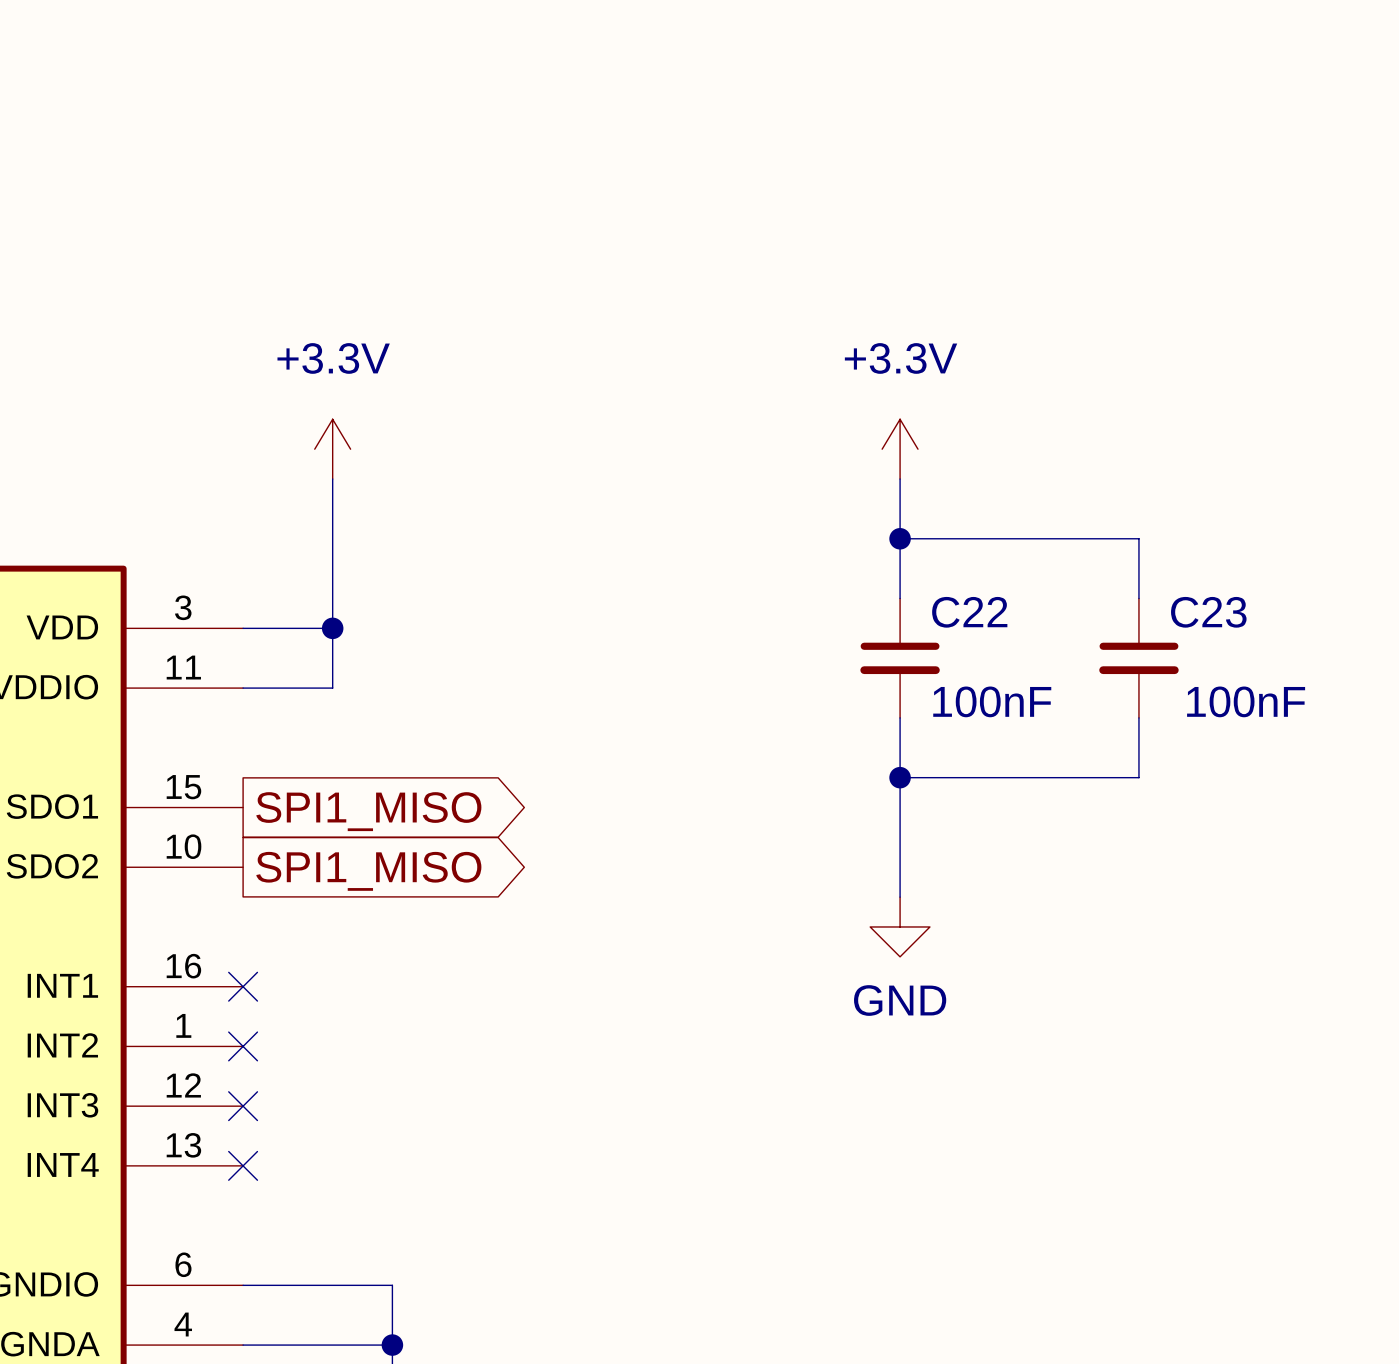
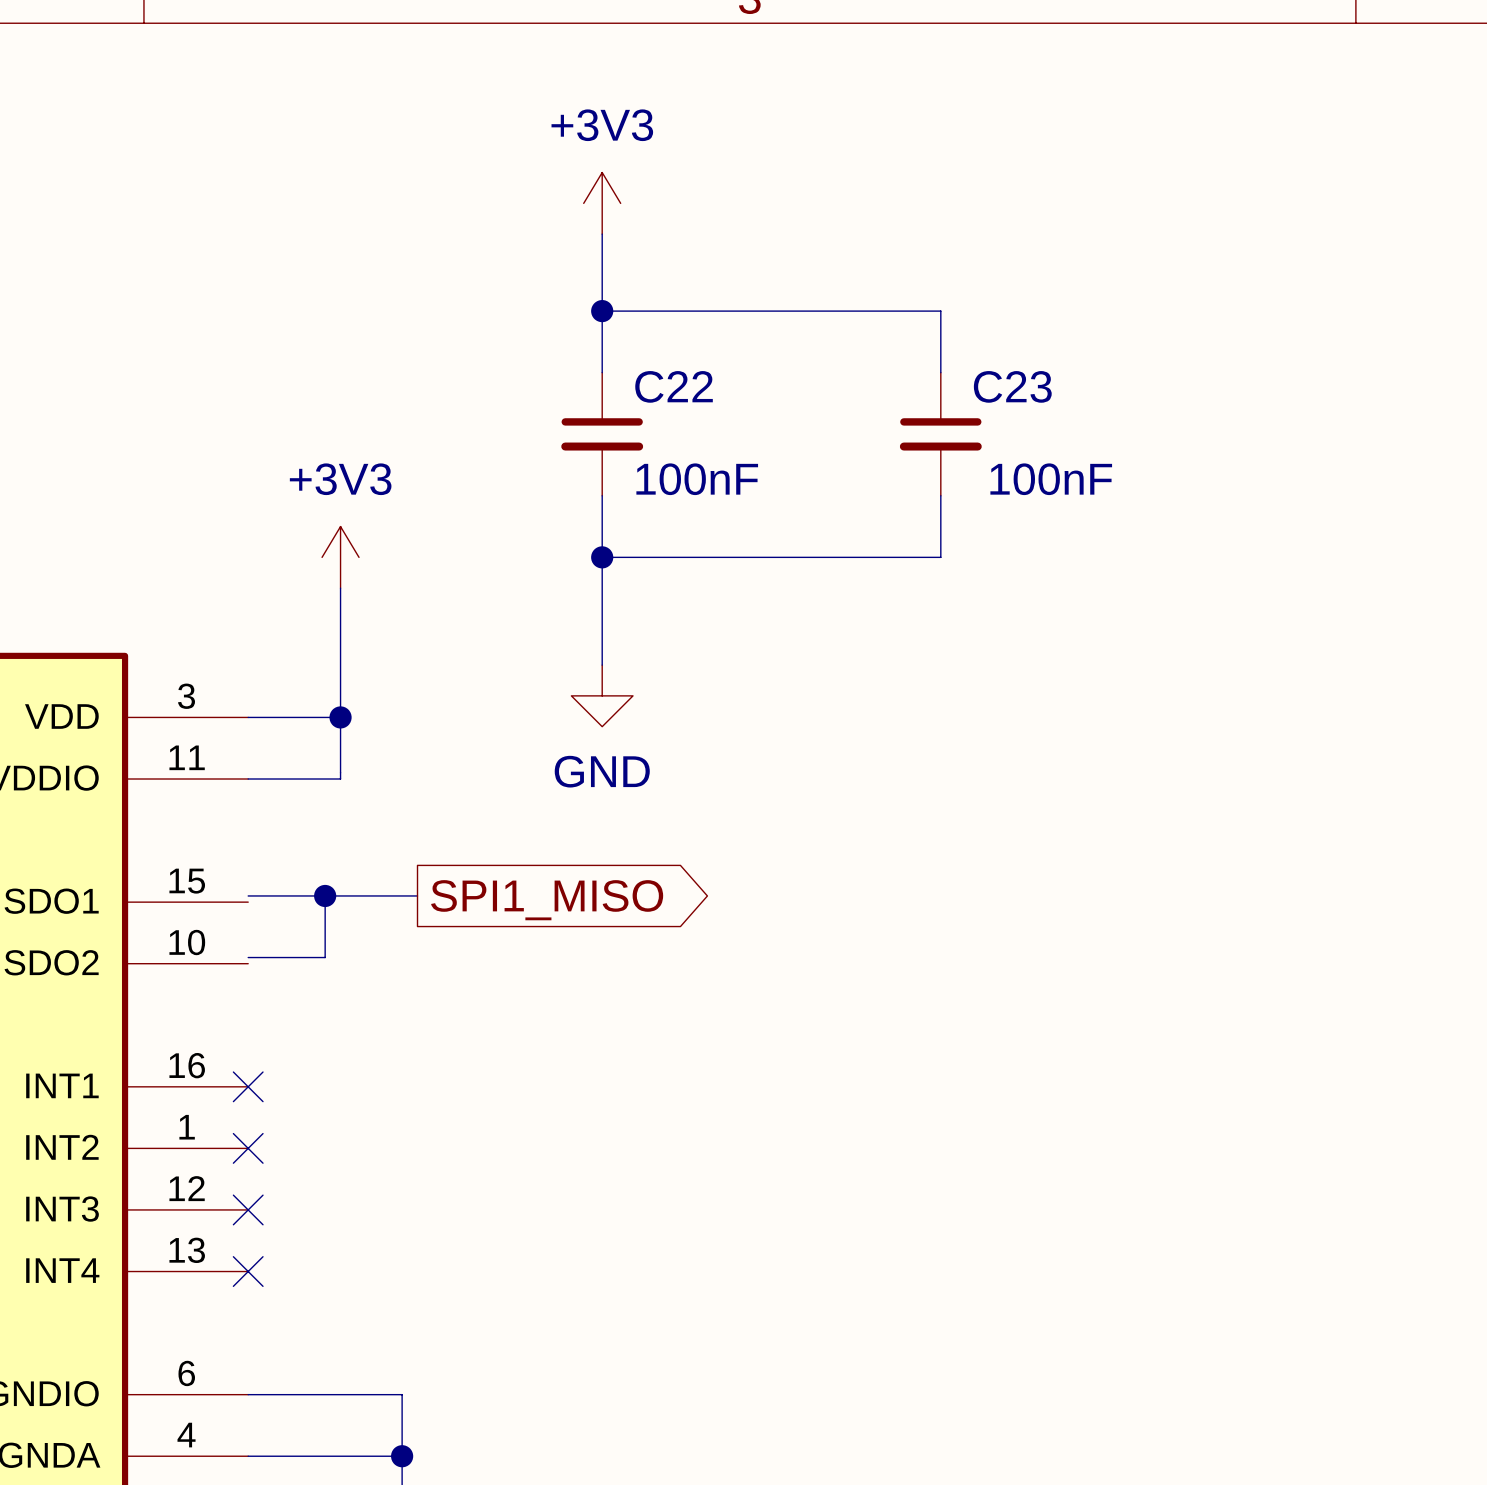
power symbol: none -> +3V3 (602, 203)
wire: none -> (602, 234) (602, 372)
wire: none -> (602, 311) (940, 311) (940, 372)
junction: none -> (602, 311)
wire: none -> (602, 495) (602, 665)
wire: none -> (940, 495) (940, 557) (602, 557)
power symbol: +3.3V (332, 449) -> none
power symbol: +3.3V (900, 449) -> none
power symbol: none -> +3V3 (340, 557)
junction: none -> (602, 557)
wire: (900, 479) (900, 598) -> none
wire: (900, 538) (1138, 538) (1138, 598) -> none
junction: (900, 538) -> none
C22 position: (900, 658) -> (602, 434)
C23 position: (1138, 658) -> (940, 434)
wire: (900, 717) (900, 897) -> none
wire: (1138, 717) (1138, 777) (900, 777) -> none
junction: (900, 777) -> none
wire: none -> (248, 895) (417, 895)
wire: none -> (325, 895) (325, 957) (248, 957)
junction: none -> (325, 895)
global label: none -> SPI1_MISO (547, 900)
global label: SPI1_MISO (368, 811) -> none
global label: SPI1_MISO (368, 871) -> none
power symbol position: GND (900, 926) -> GND (602, 695)

